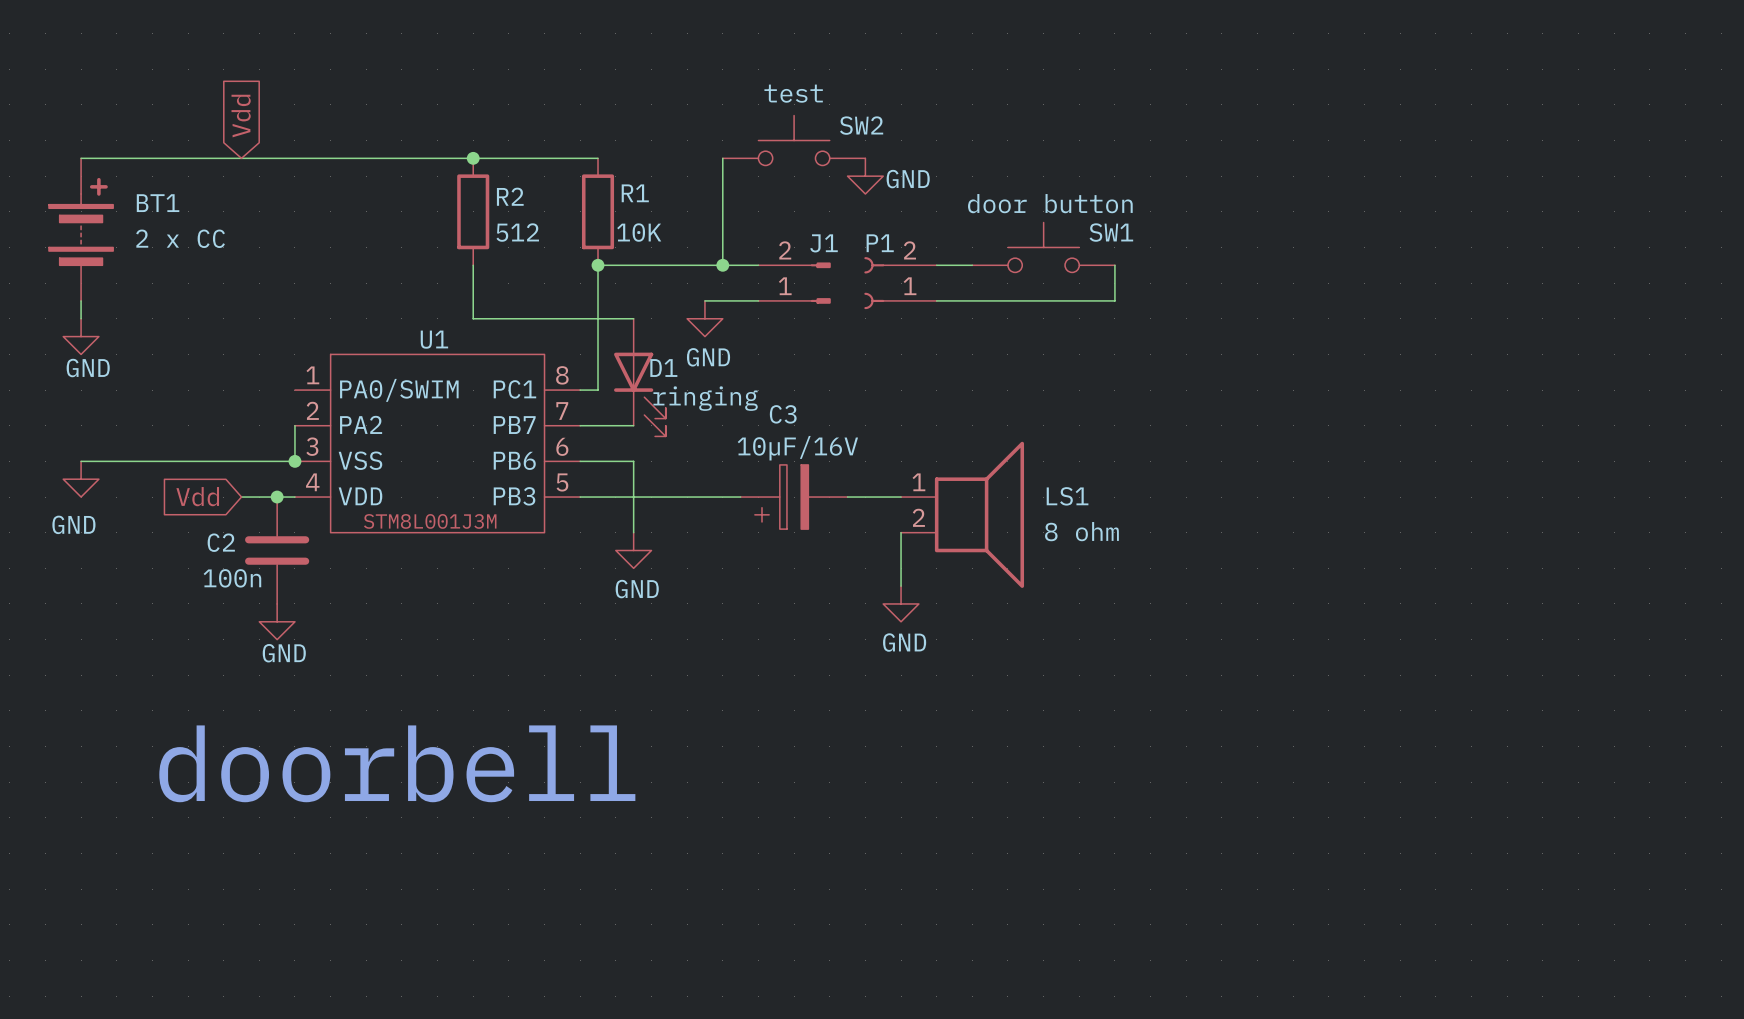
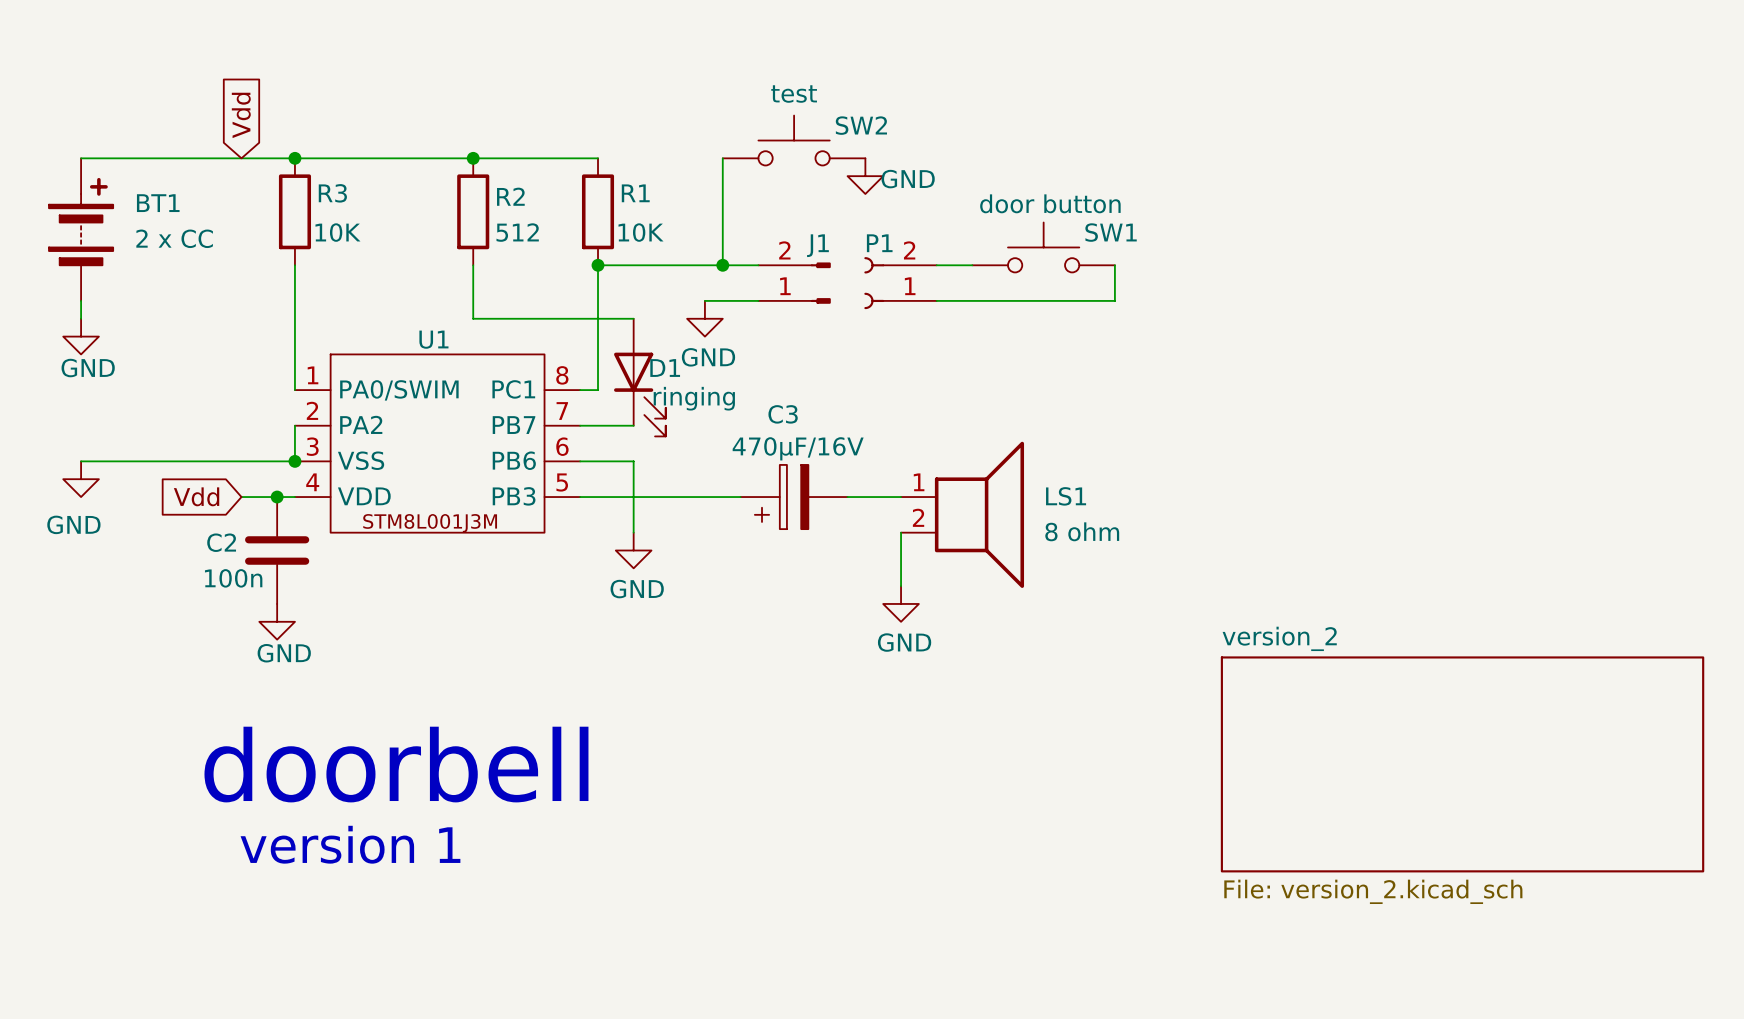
junction: none -> (294, 158)
R3: none -> 10K (294, 211)
wire: none -> (294, 265) (294, 390)
C3 value: 10µF/16V (797, 448) -> 470µF/16V (798, 448)
sheet version_2: none -> File: version_2.kicad_sch (1462, 764)
text: none -> version 1 (350, 844)

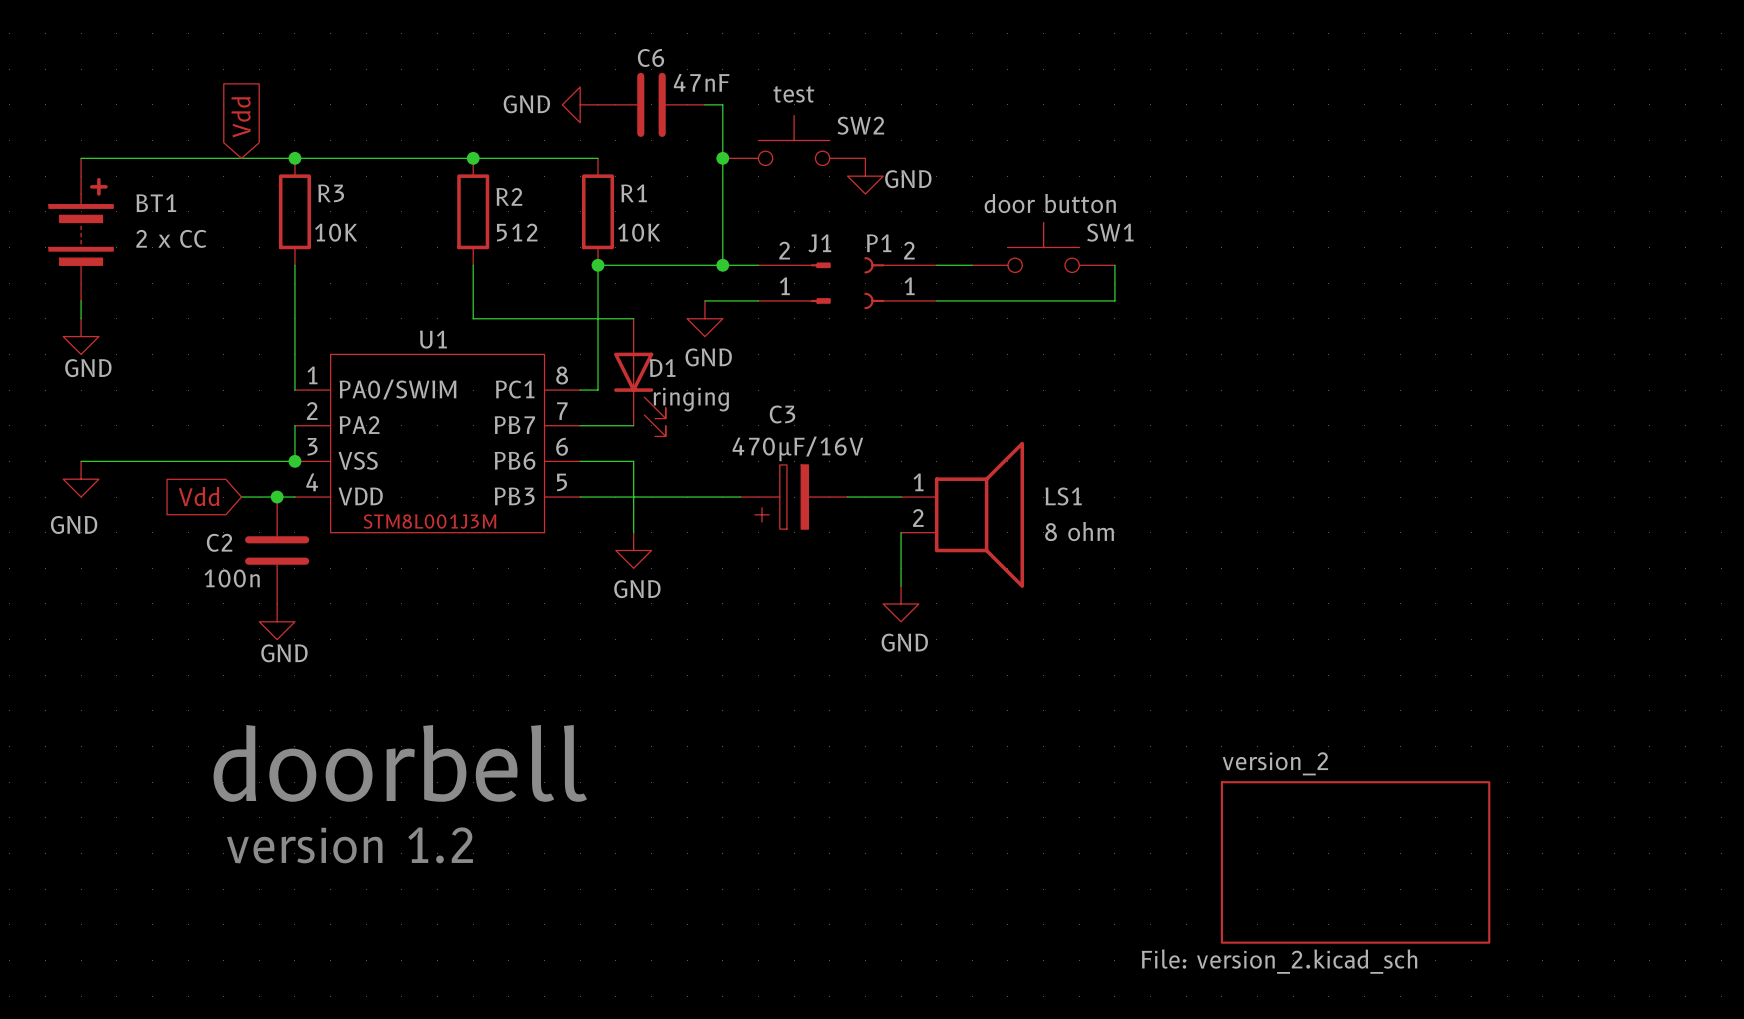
power symbol: none -> GND (580, 104)
C6: none -> 47nF (651, 104)
wire: none -> (704, 104) (722, 104) (722, 158)
junction: none -> (722, 158)
sheet version_2 name position: version_2 (1279, 638) -> version_2 (1275, 763)
sheet version_2 shape: [1220, 656, 1705, 873] -> [1220, 781, 1491, 944]
text: version 1 (350, 844) -> version 1.2 (349, 845)
sheet version_2 value position: File: version_2.kicad_sch (1373, 891) -> File: version_2.kicad_sch (1279, 961)

